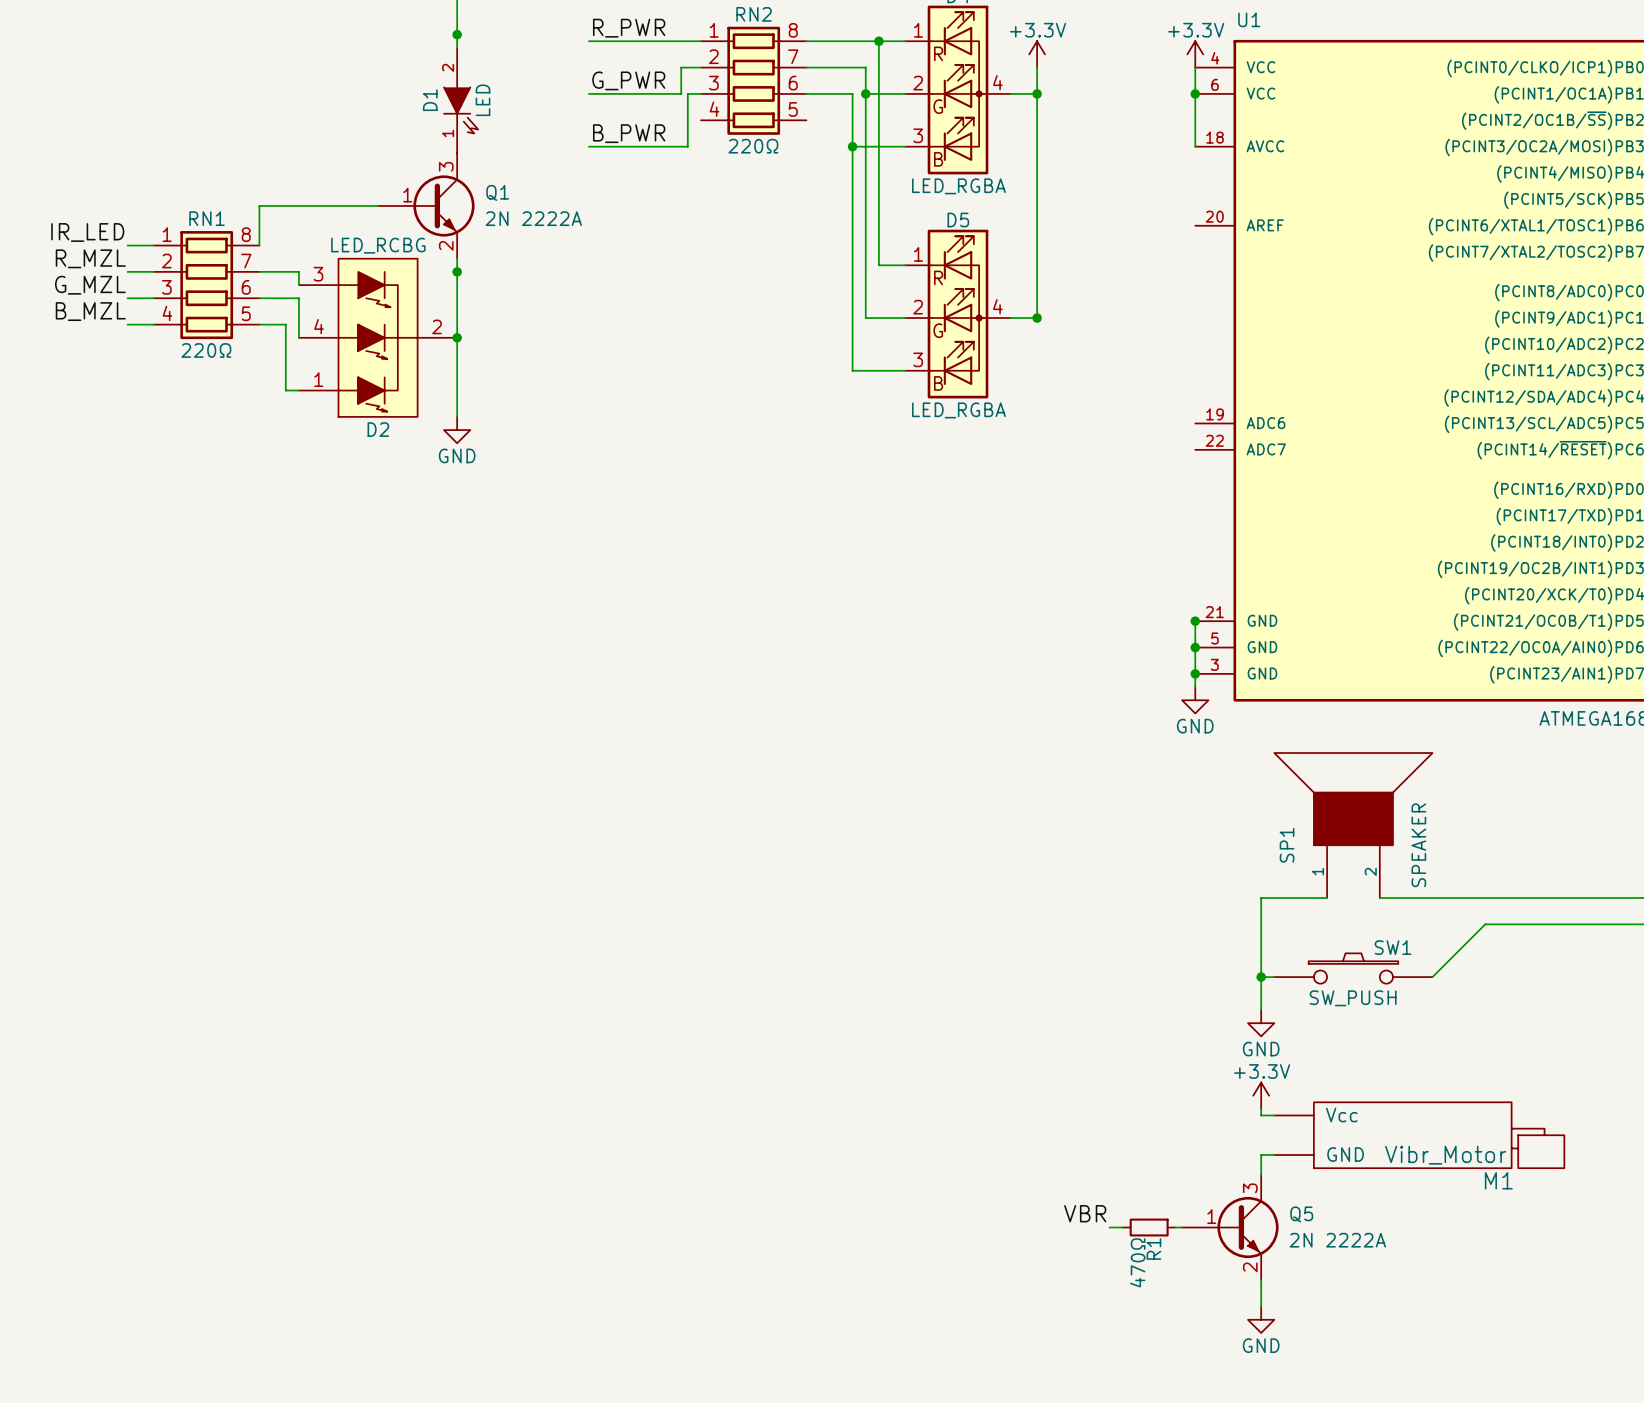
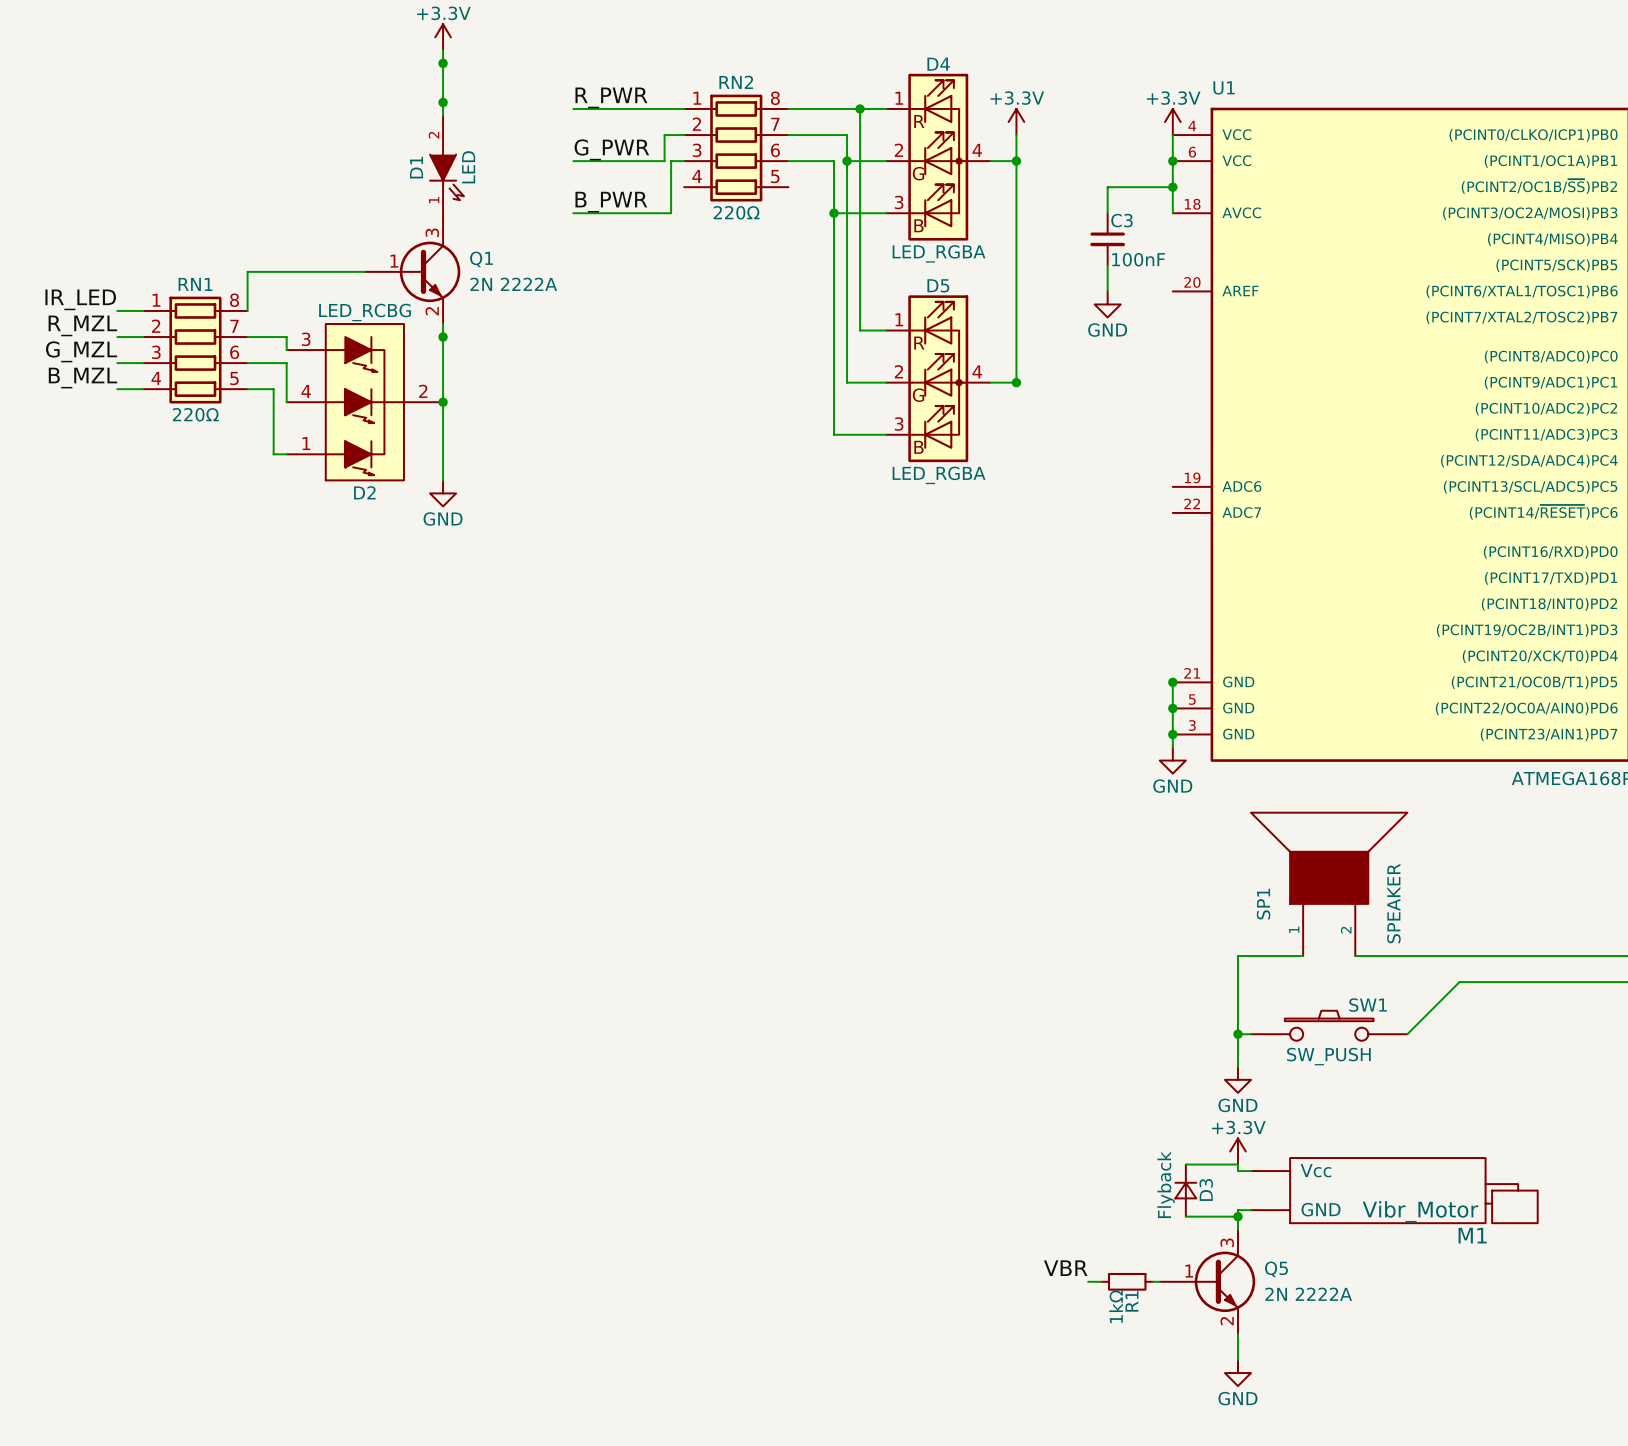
wire: none -> (1172, 187) (1107, 187) (1107, 213)
junction: none -> (1172, 187)
C3: none -> 100nF (1107, 239)
wire: none -> (1107, 265) (1107, 291)
power symbol: none -> GND (1107, 304)
wire: none -> (1185, 1164) (1237, 1164)
D3: none -> Flyback (1185, 1190)
wire: none -> (1185, 1216) (1237, 1216)
junction: none -> (1237, 1216)
R1 value: 470Ω (1137, 1262) -> 1kΩ (1116, 1306)

